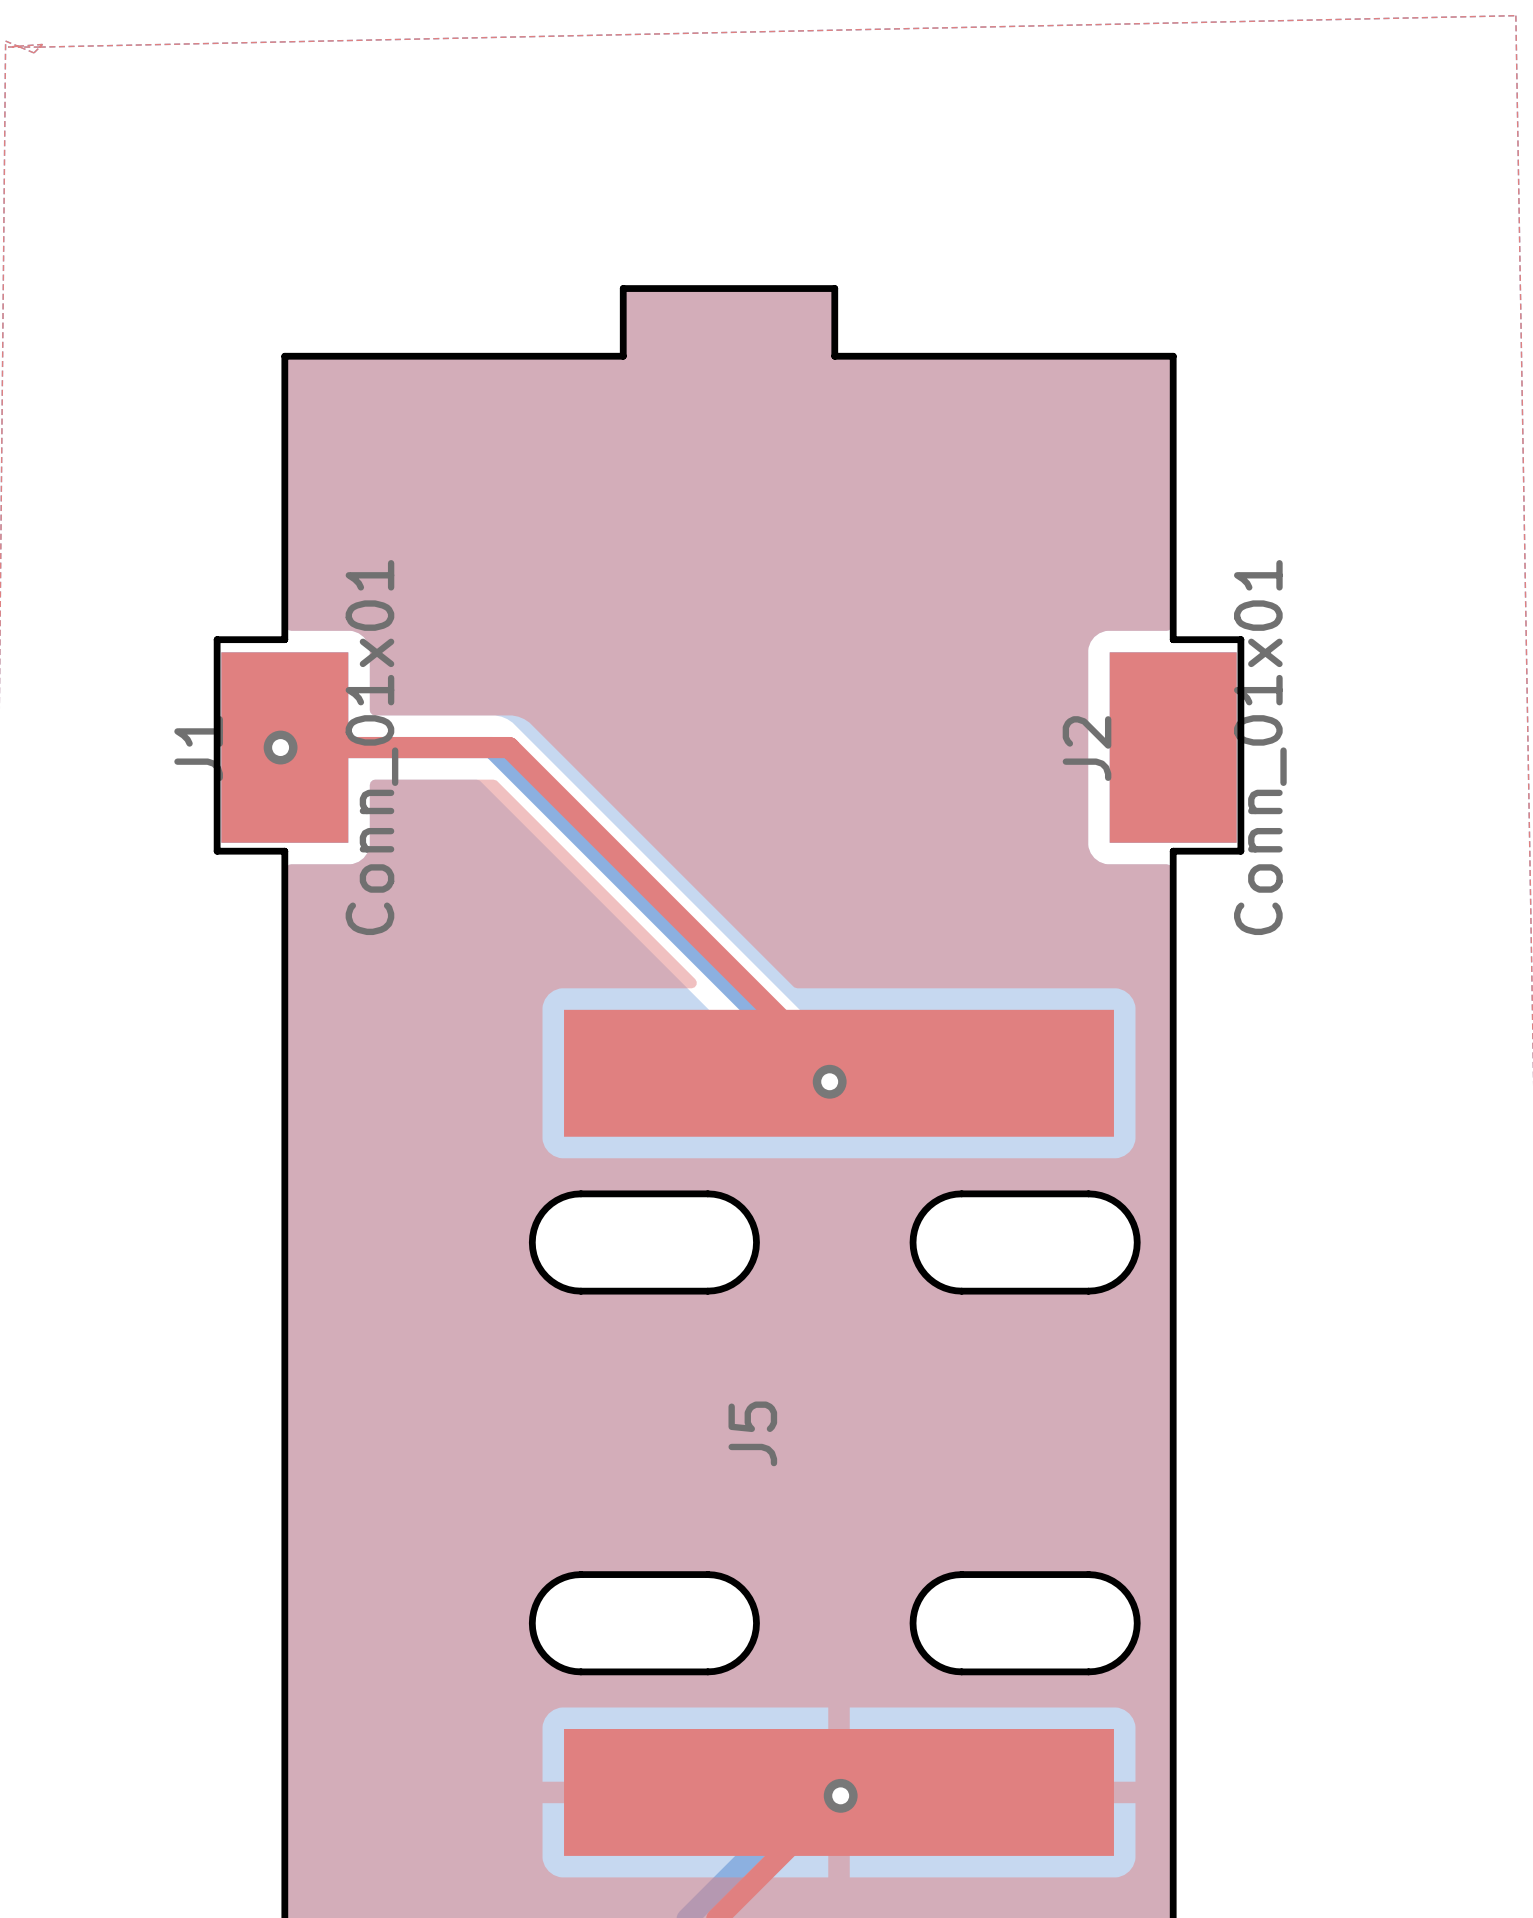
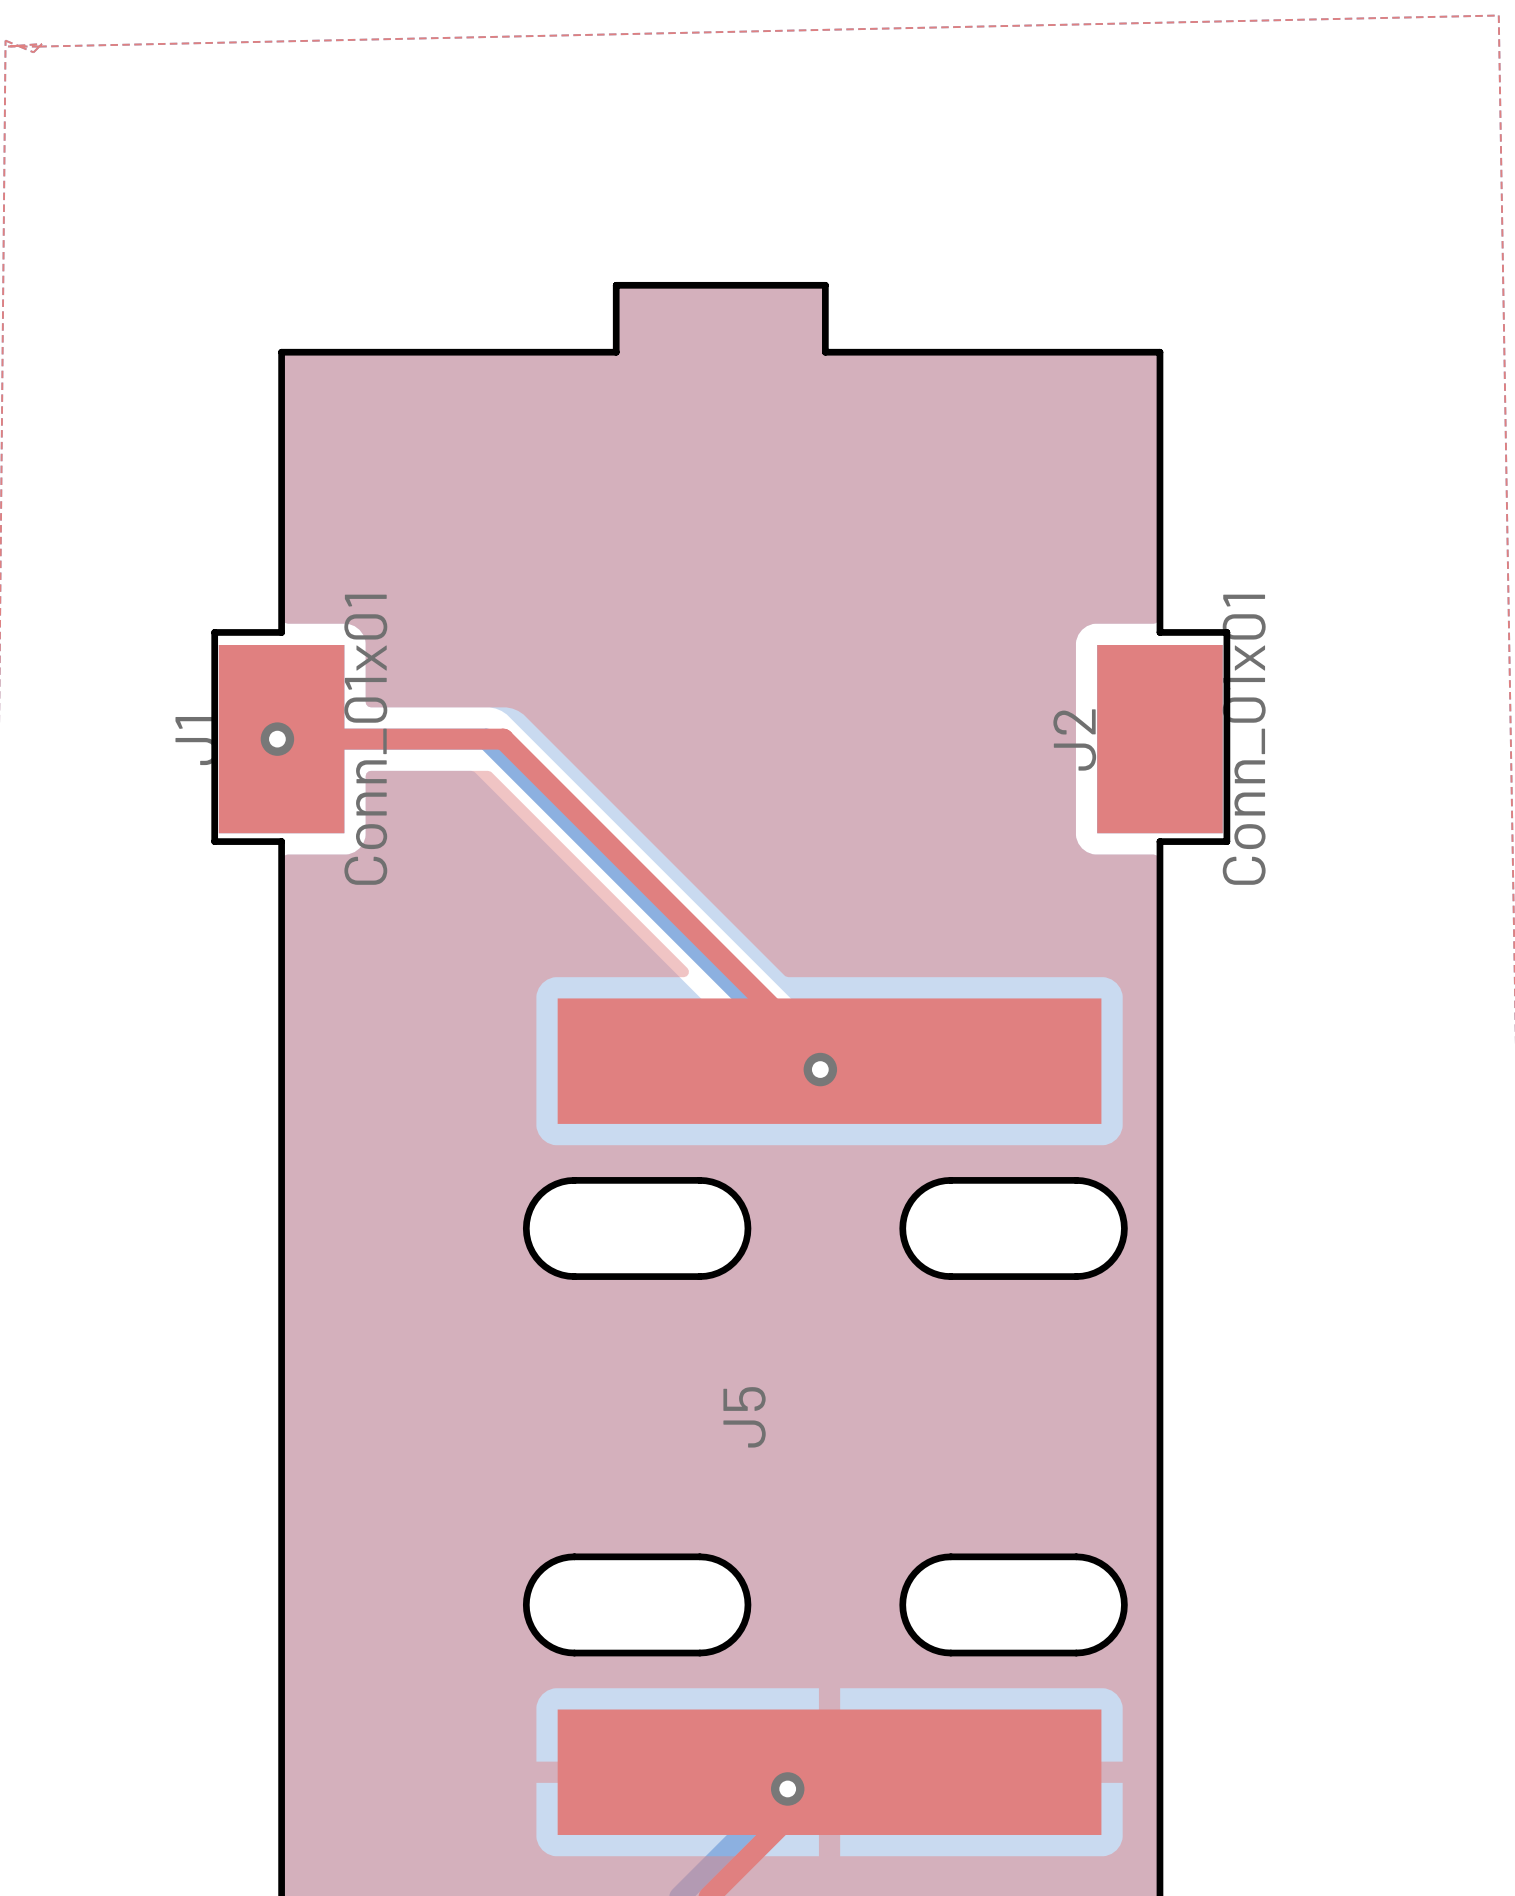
via position: (840, 1795) -> (787, 1788)

